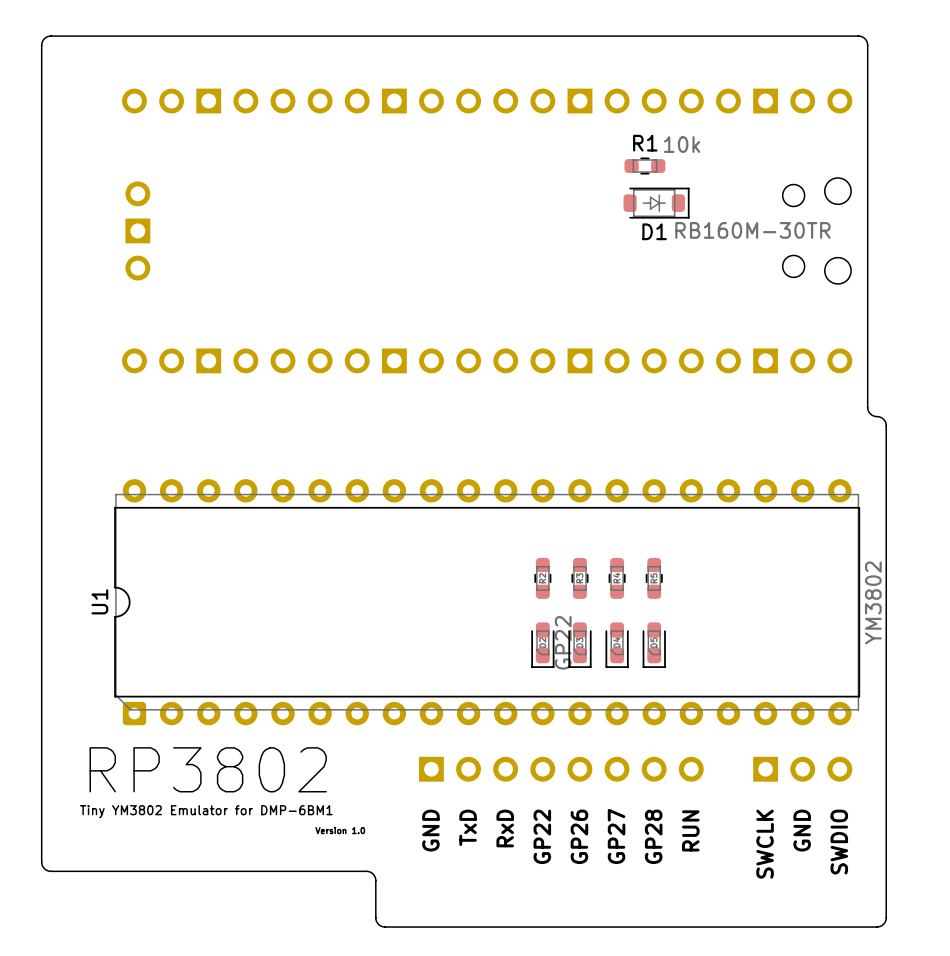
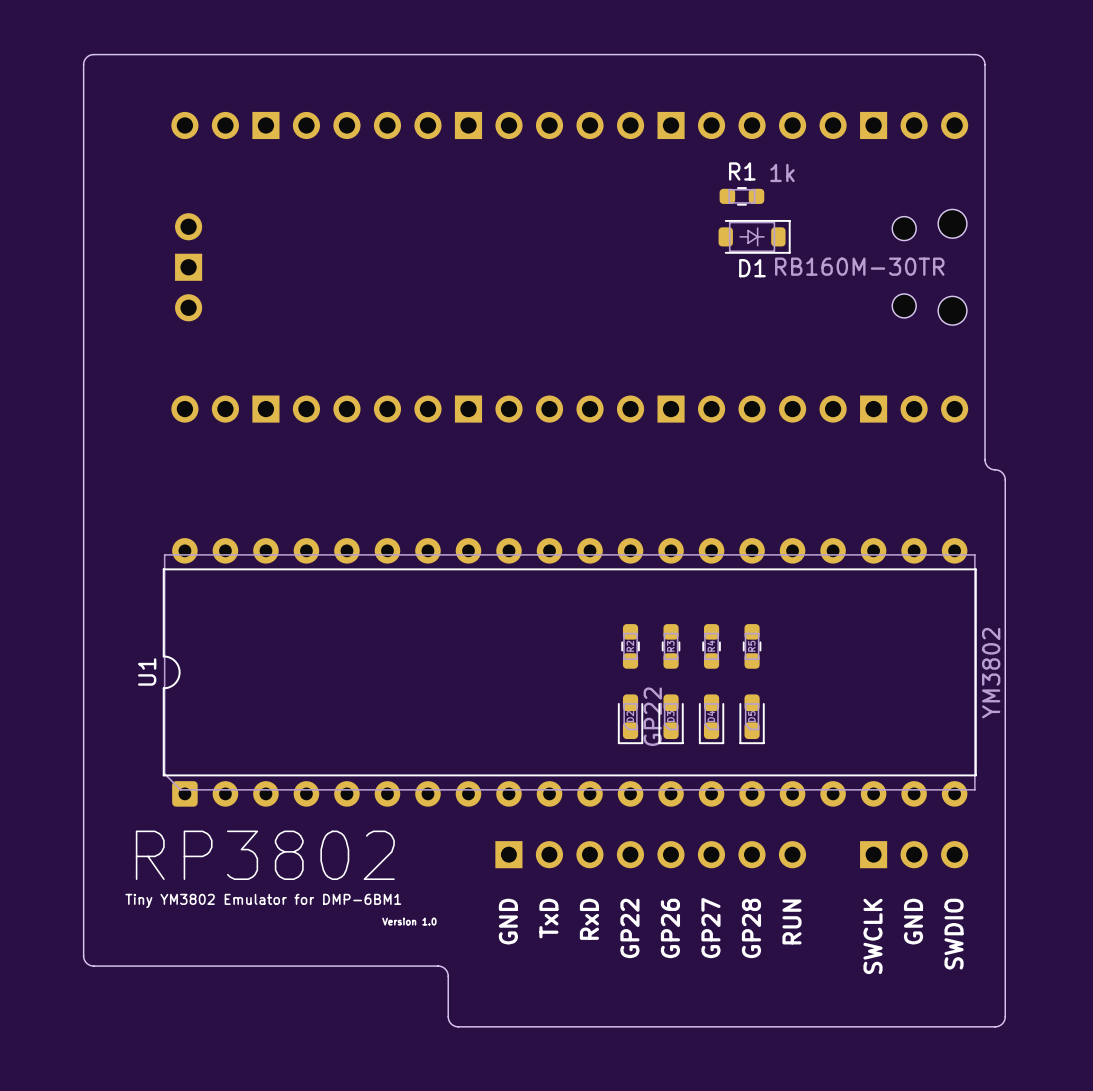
R1 value: 10k (682, 144) -> 1k (782, 172)

